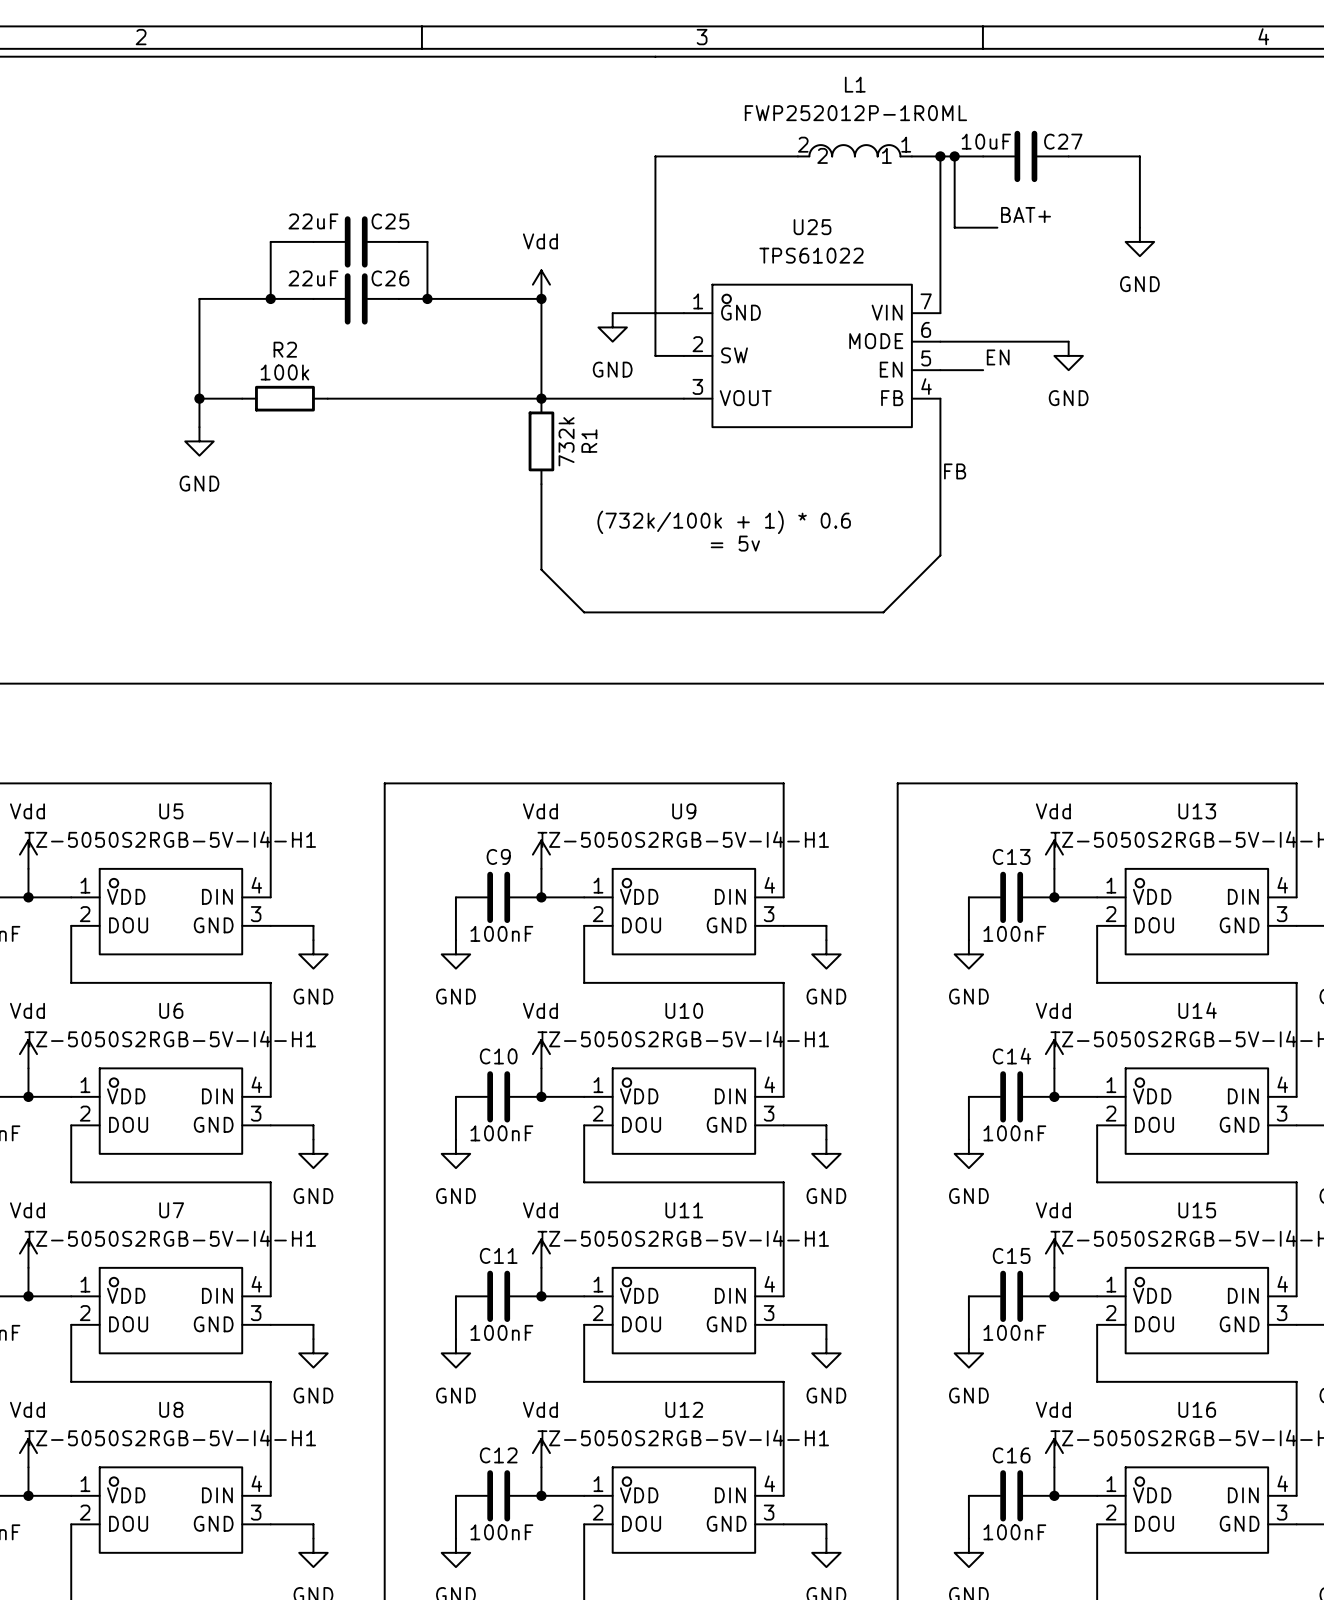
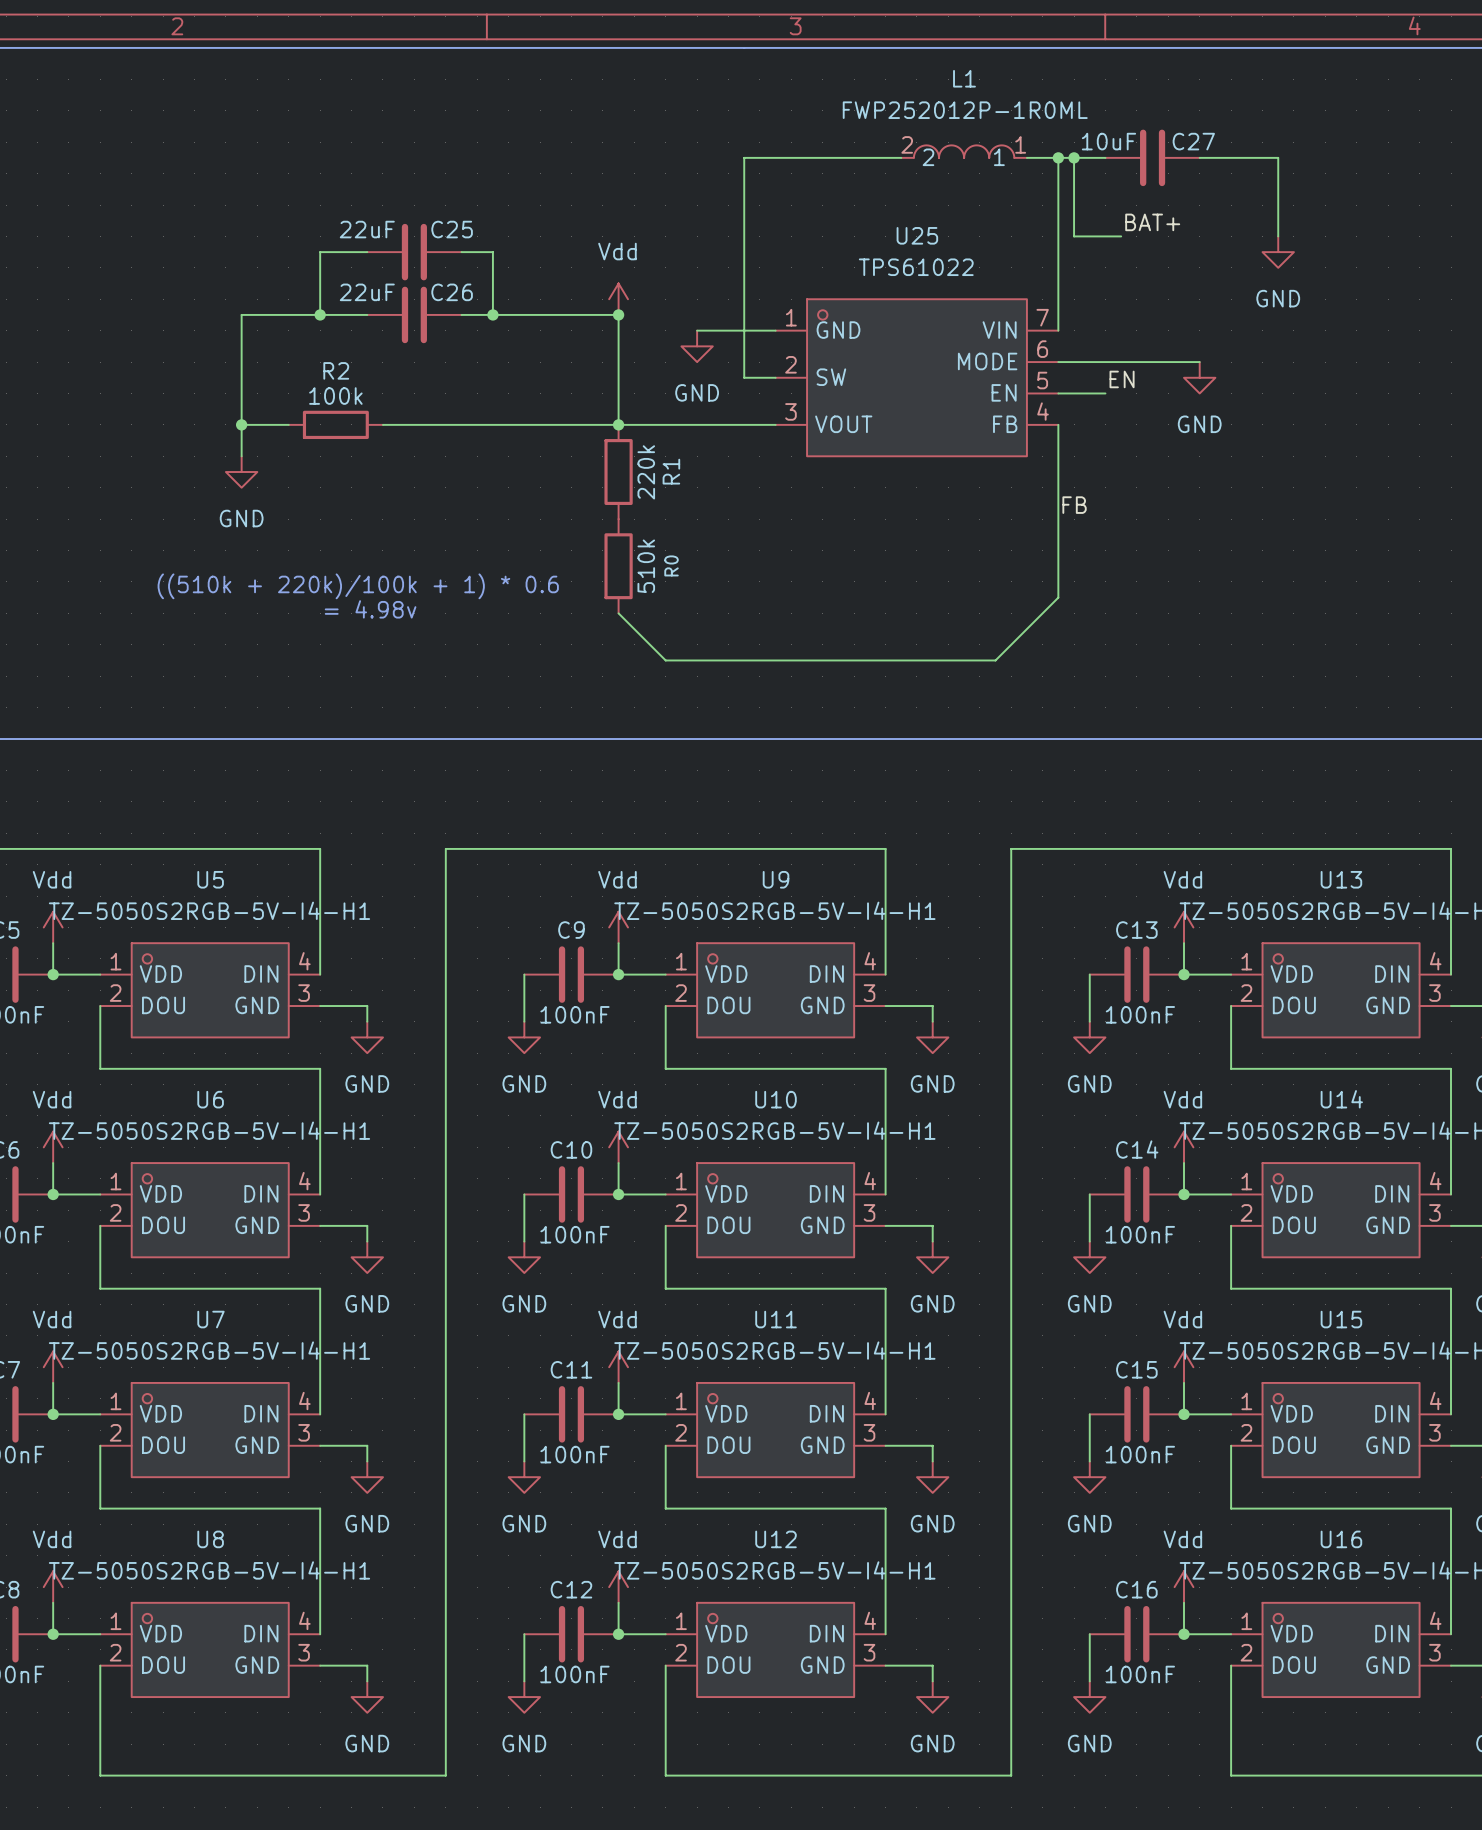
R1 value: 732k (566, 441) -> 220k (646, 472)
wire: (541, 484) (541, 569) -> none
text: (732k/100k + 1) * 0.6 (724, 522) -> none
R0: none -> 510k (618, 566)
text: = 5v (735, 543) -> none
text: none -> ((510k + 220k)/100k + 1) * 0.6 (358, 586)
text: none -> = 4.98v (370, 609)

